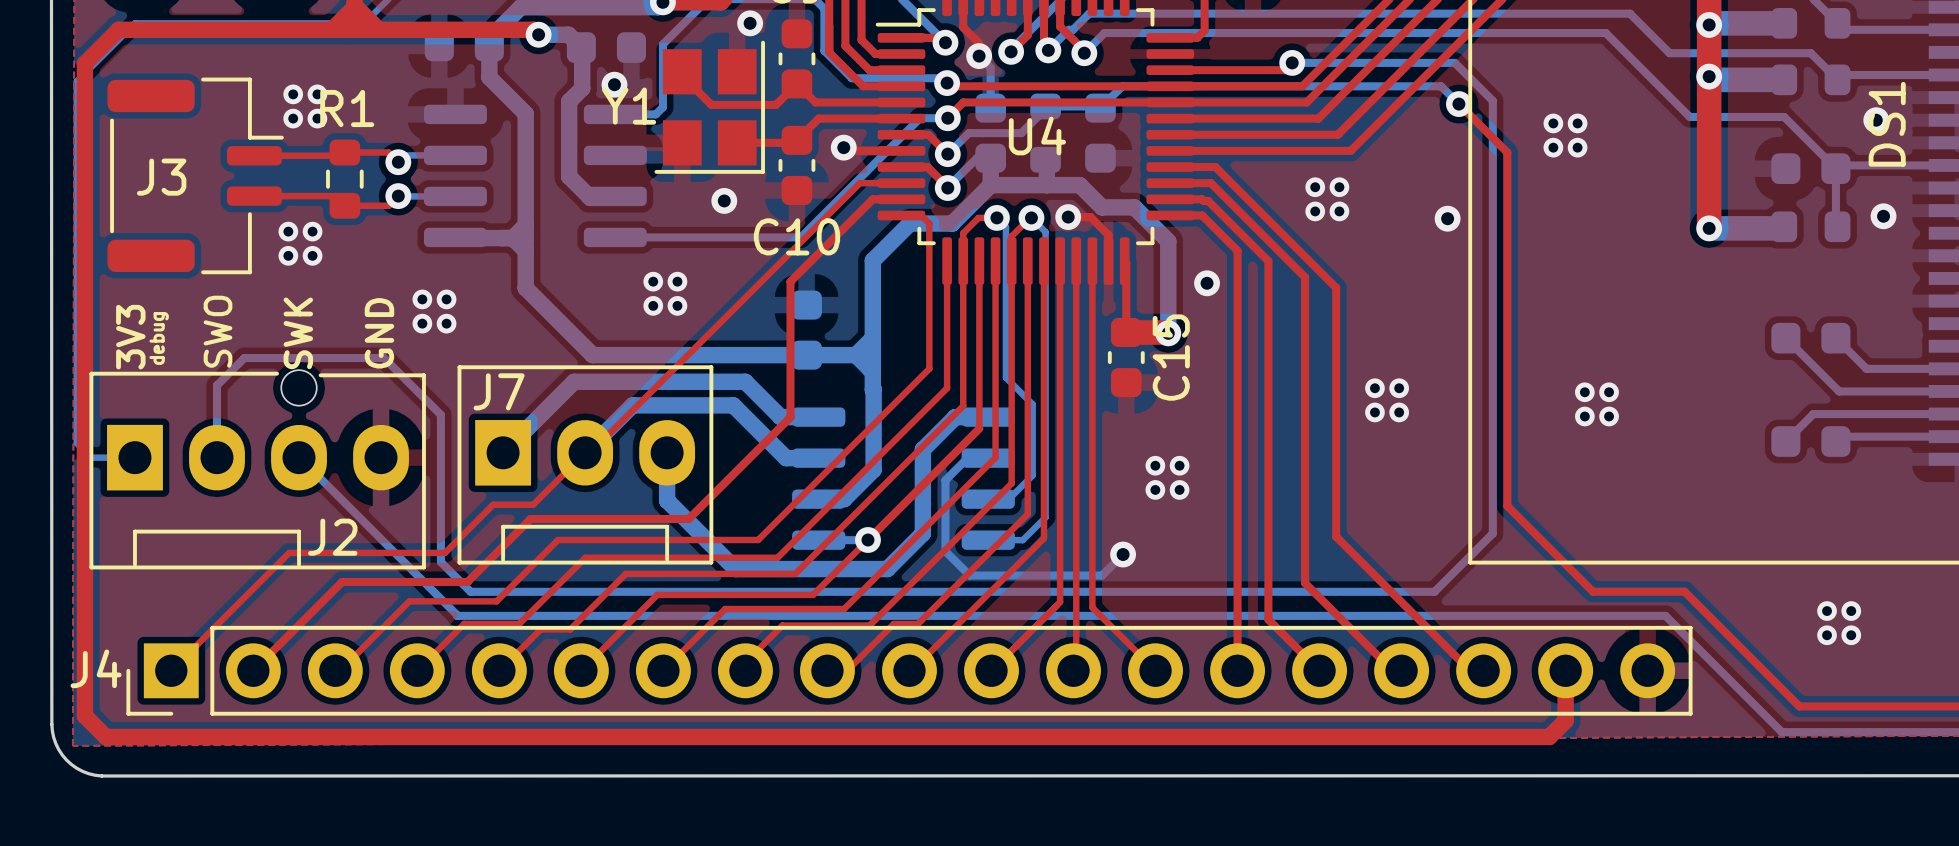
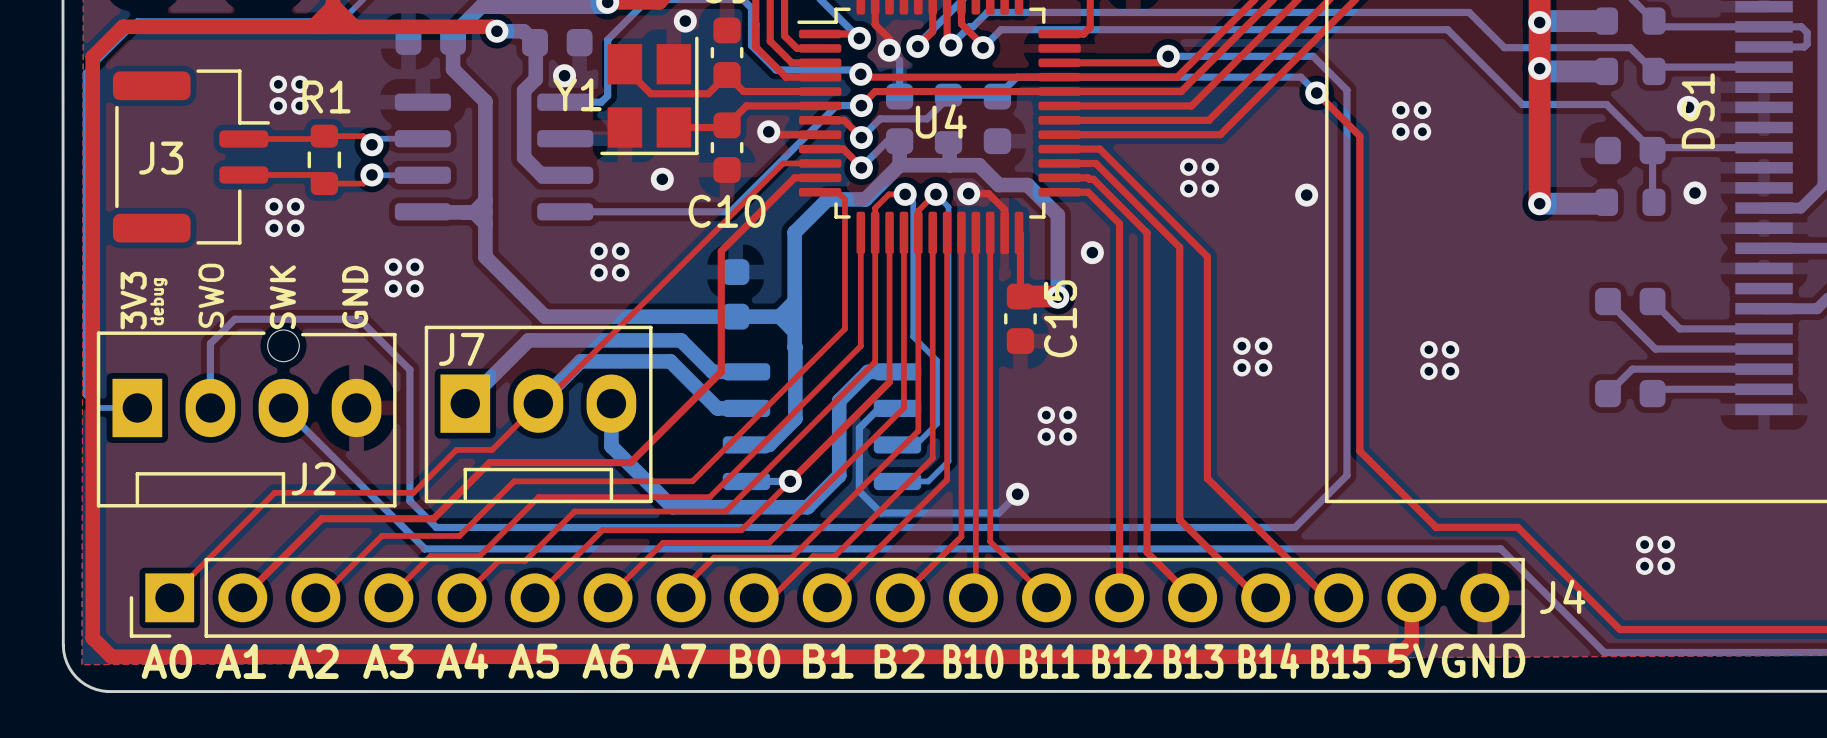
J4 name position: J4 (96, 668) -> J4 (1562, 596)
text: none -> A4 (462, 660)
text: none -> A5 (533, 661)
text: none -> A6 (607, 661)
text: none -> A7 (680, 661)
text: none -> B0 (755, 661)
text: none -> B1 (828, 661)
text: none -> B14 (1268, 660)
text: none -> 5V (1413, 660)
text: none -> GND (1483, 660)
text: none -> A0 (166, 661)
text: none -> A1 (240, 661)
text: none -> A2 (313, 661)
text: none -> A3 (388, 661)
text: none -> B2 (899, 661)
text: none -> B10 (973, 661)
text: none -> B11 (1049, 661)
text: none -> B12 (1122, 661)
text: none -> B13 (1193, 661)
text: none -> B15 (1340, 661)

